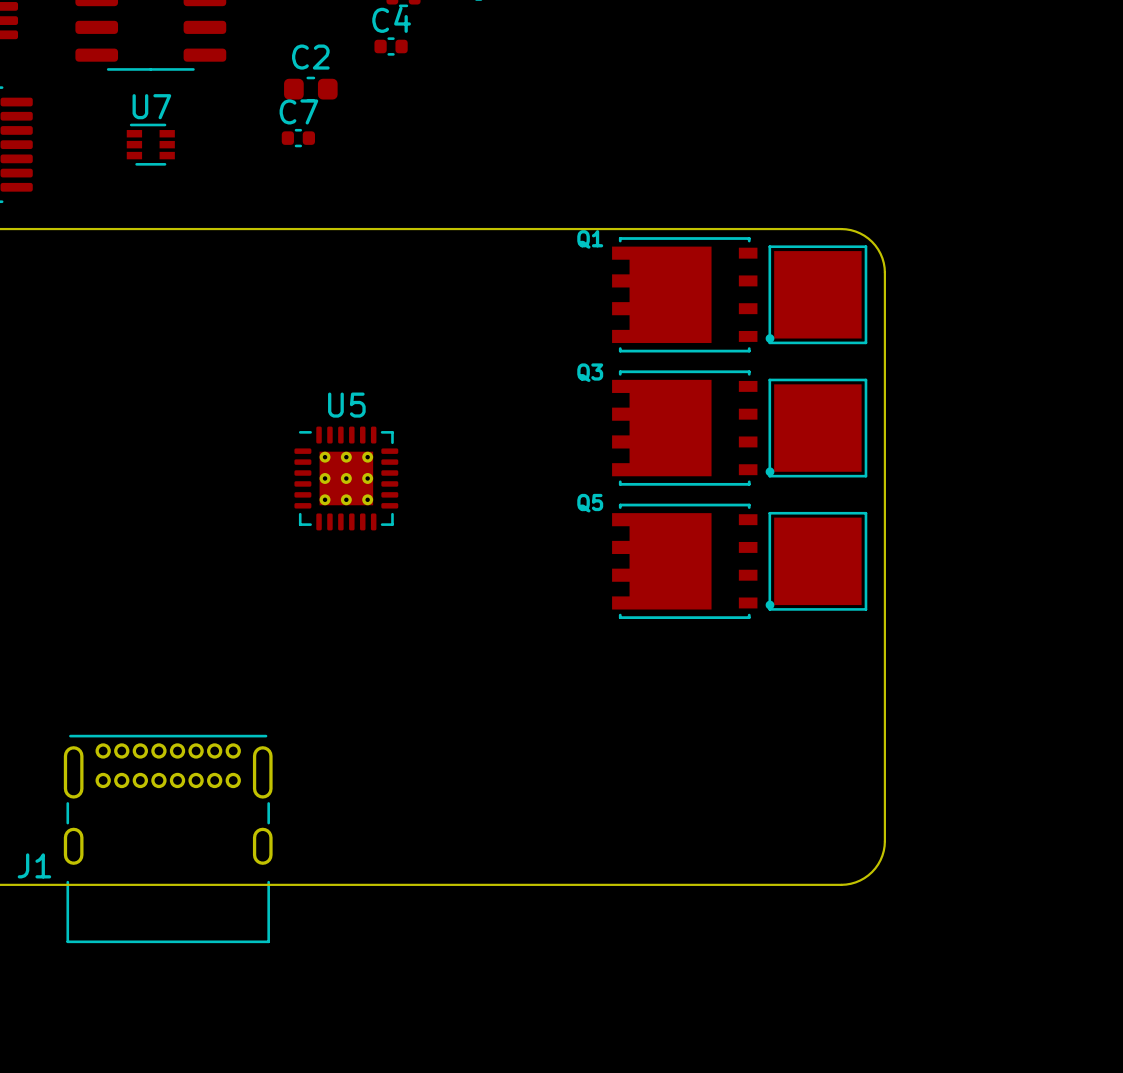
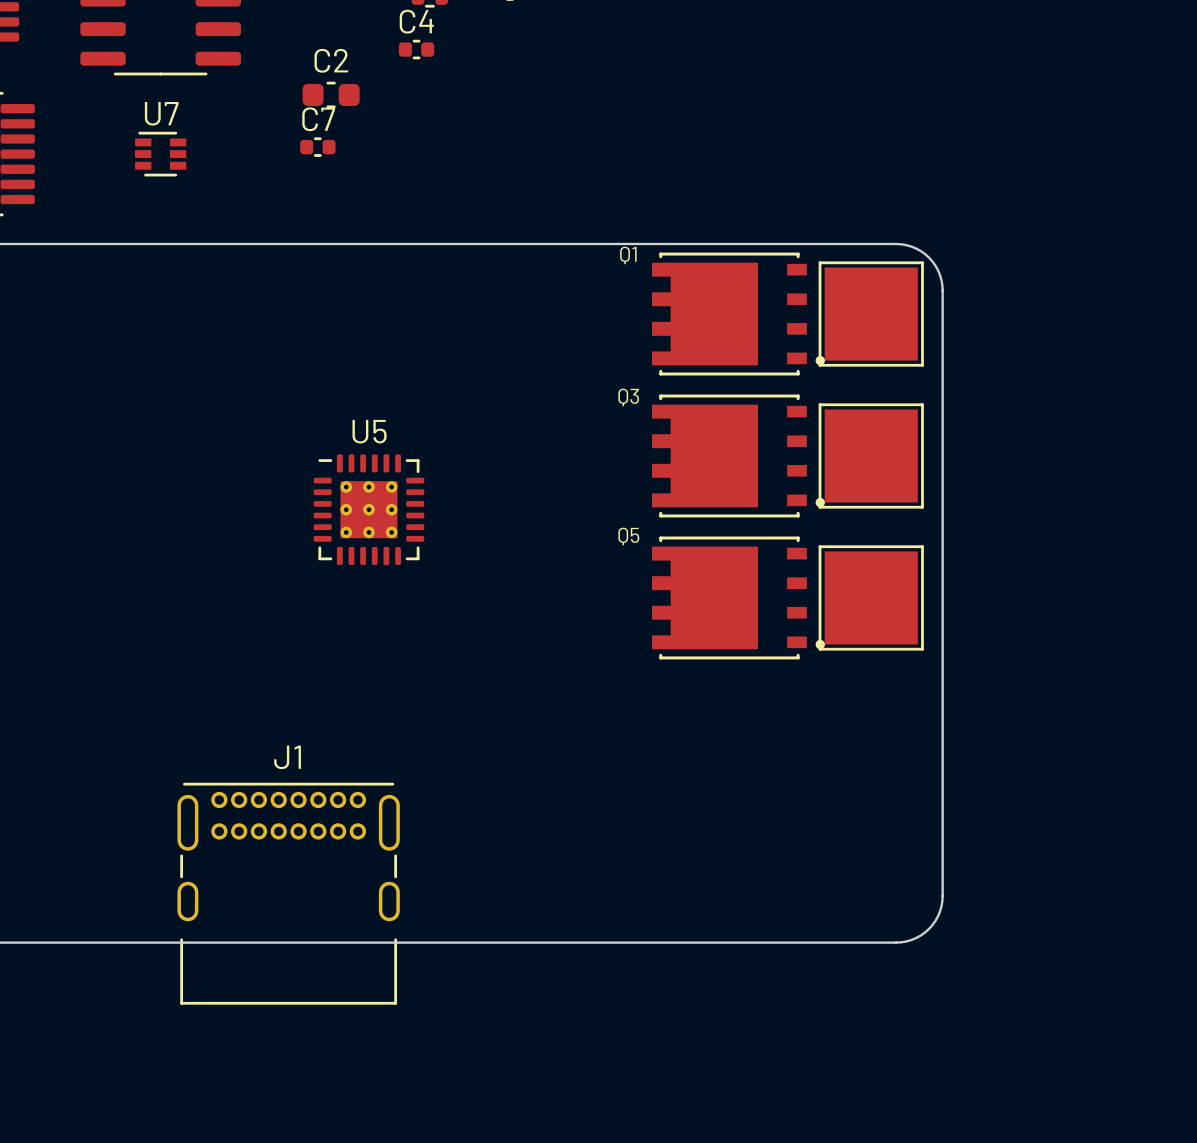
J1 position: (168, 838) -> (288, 893)
J1 name position: J1 (34, 865) -> J1 (287, 757)

